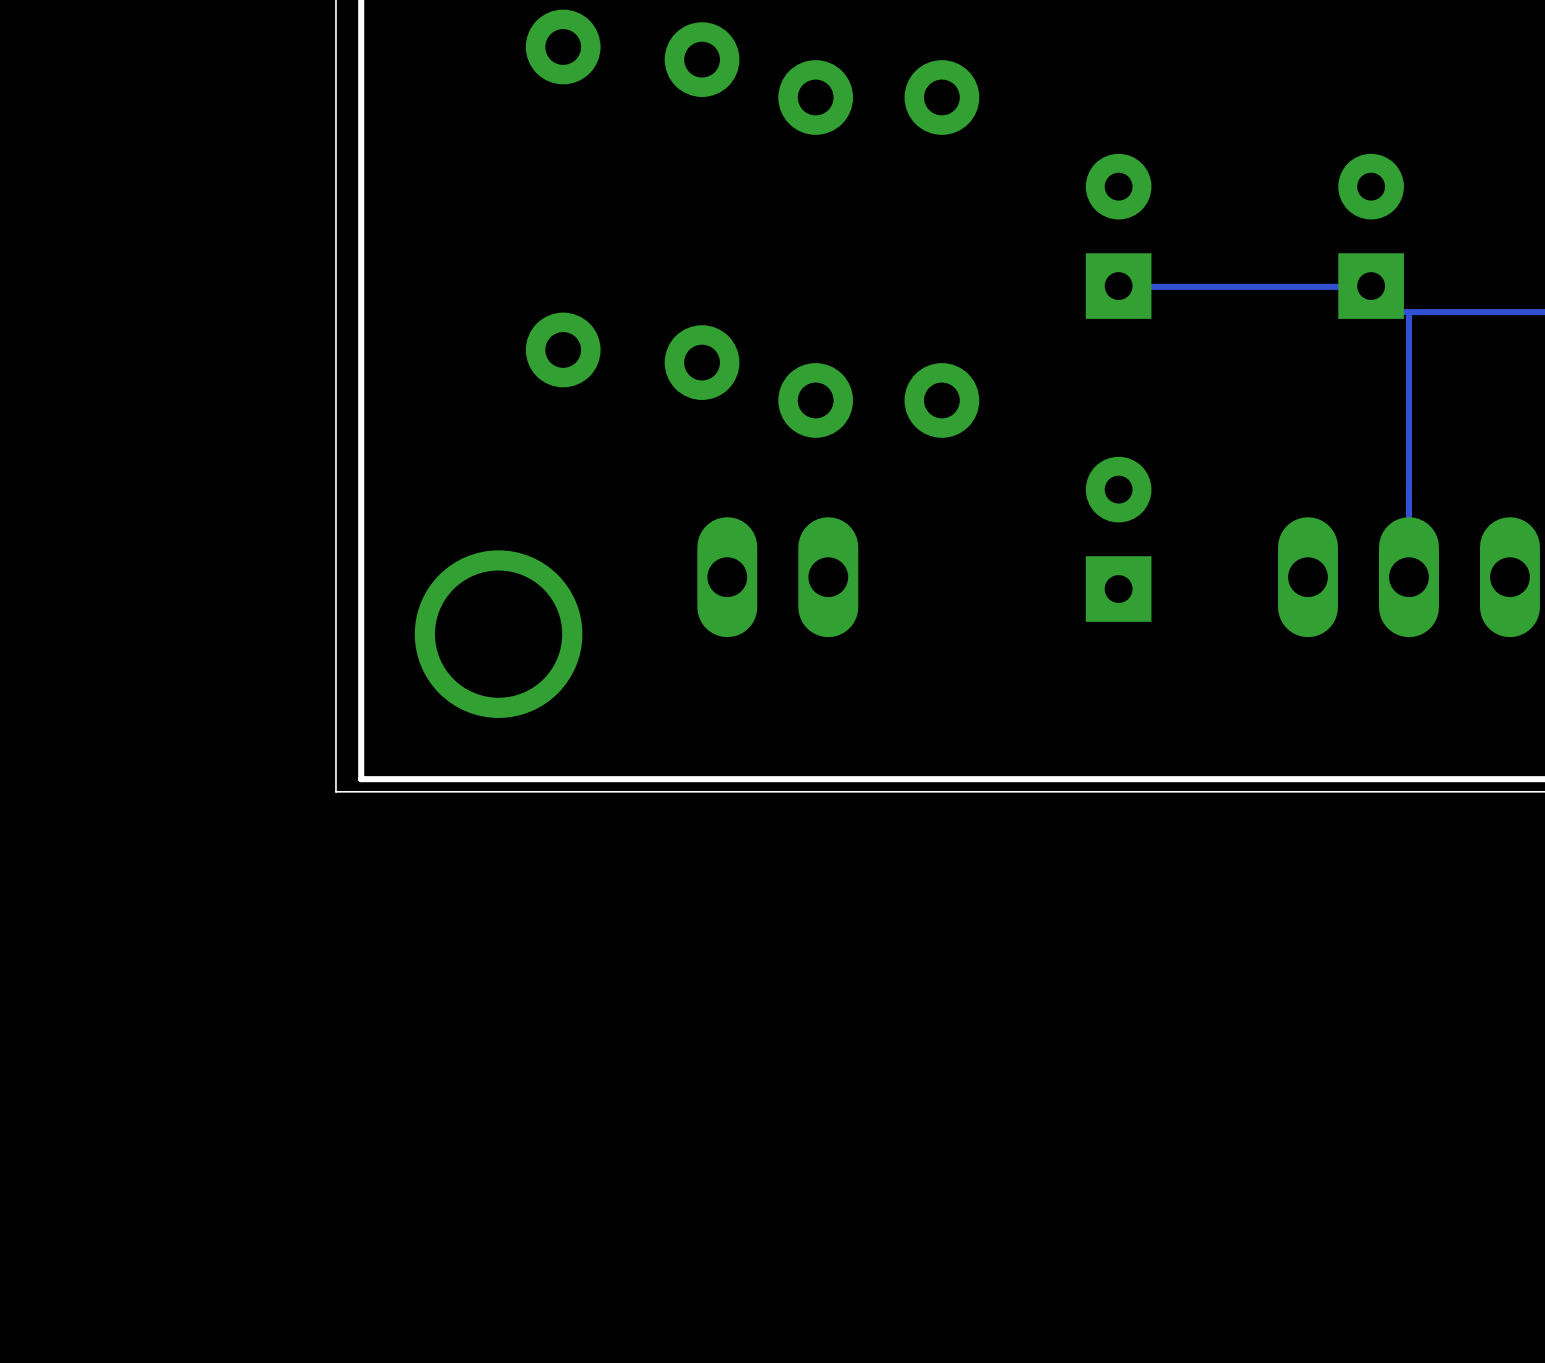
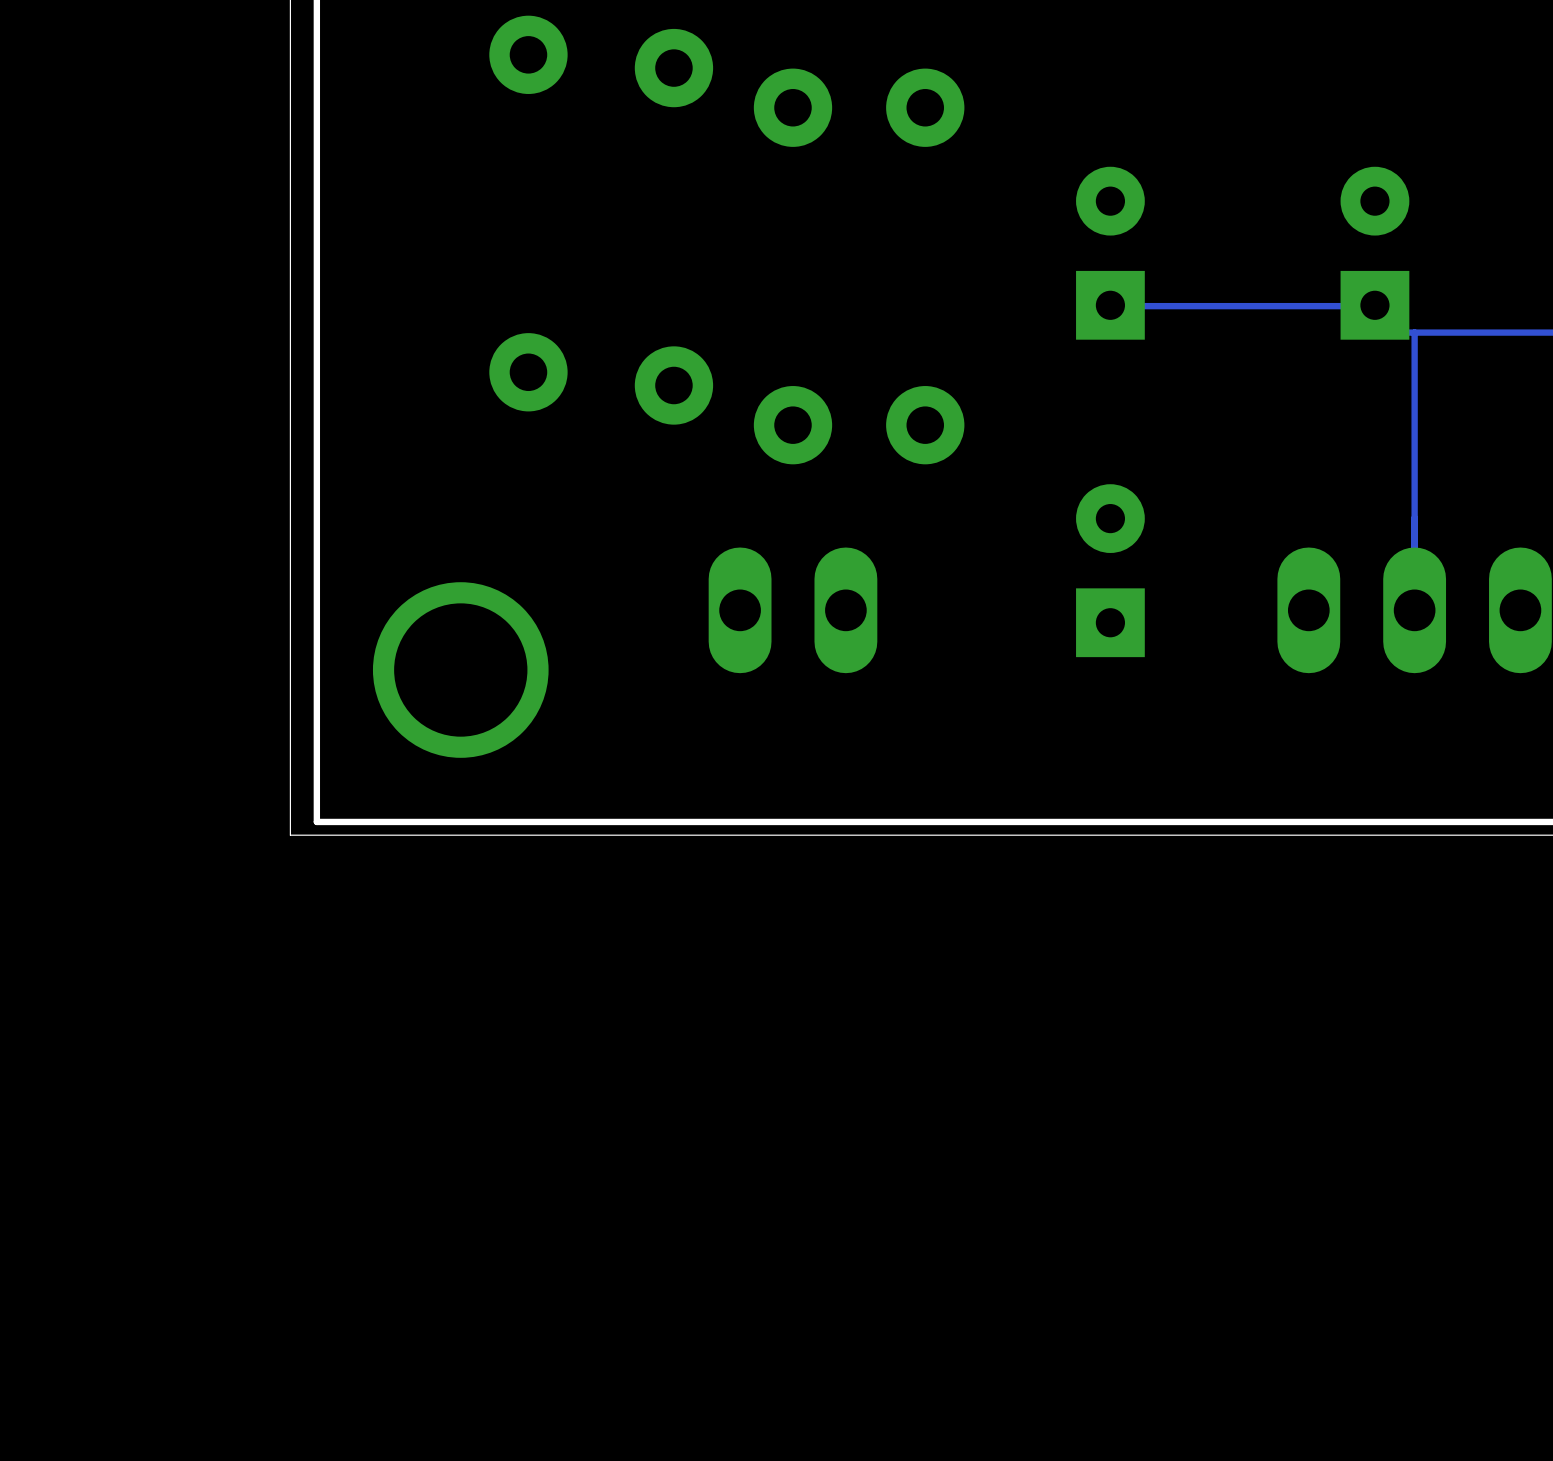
part position: (777, 577) -> (792, 610)

